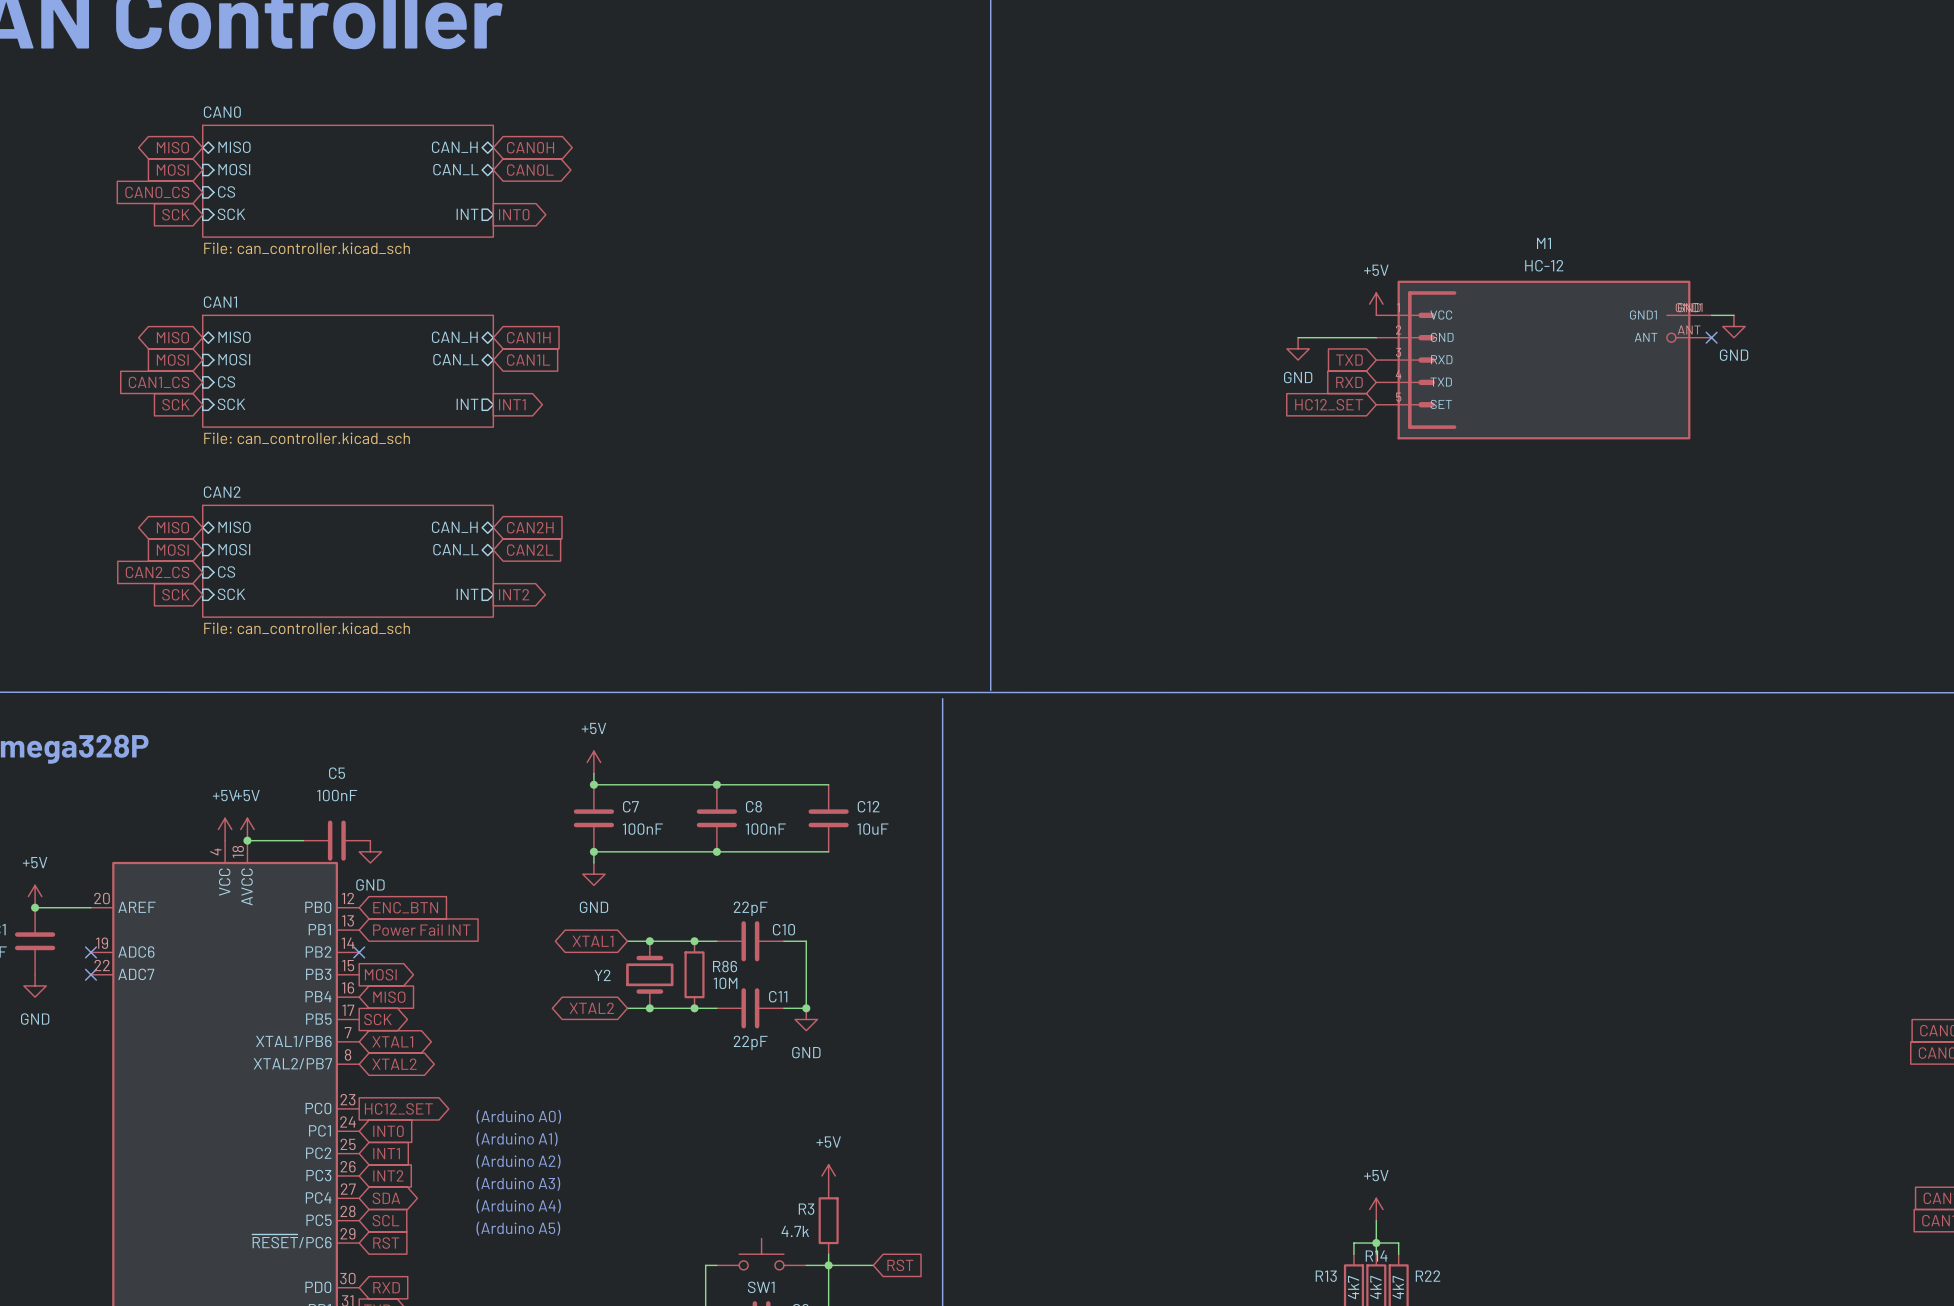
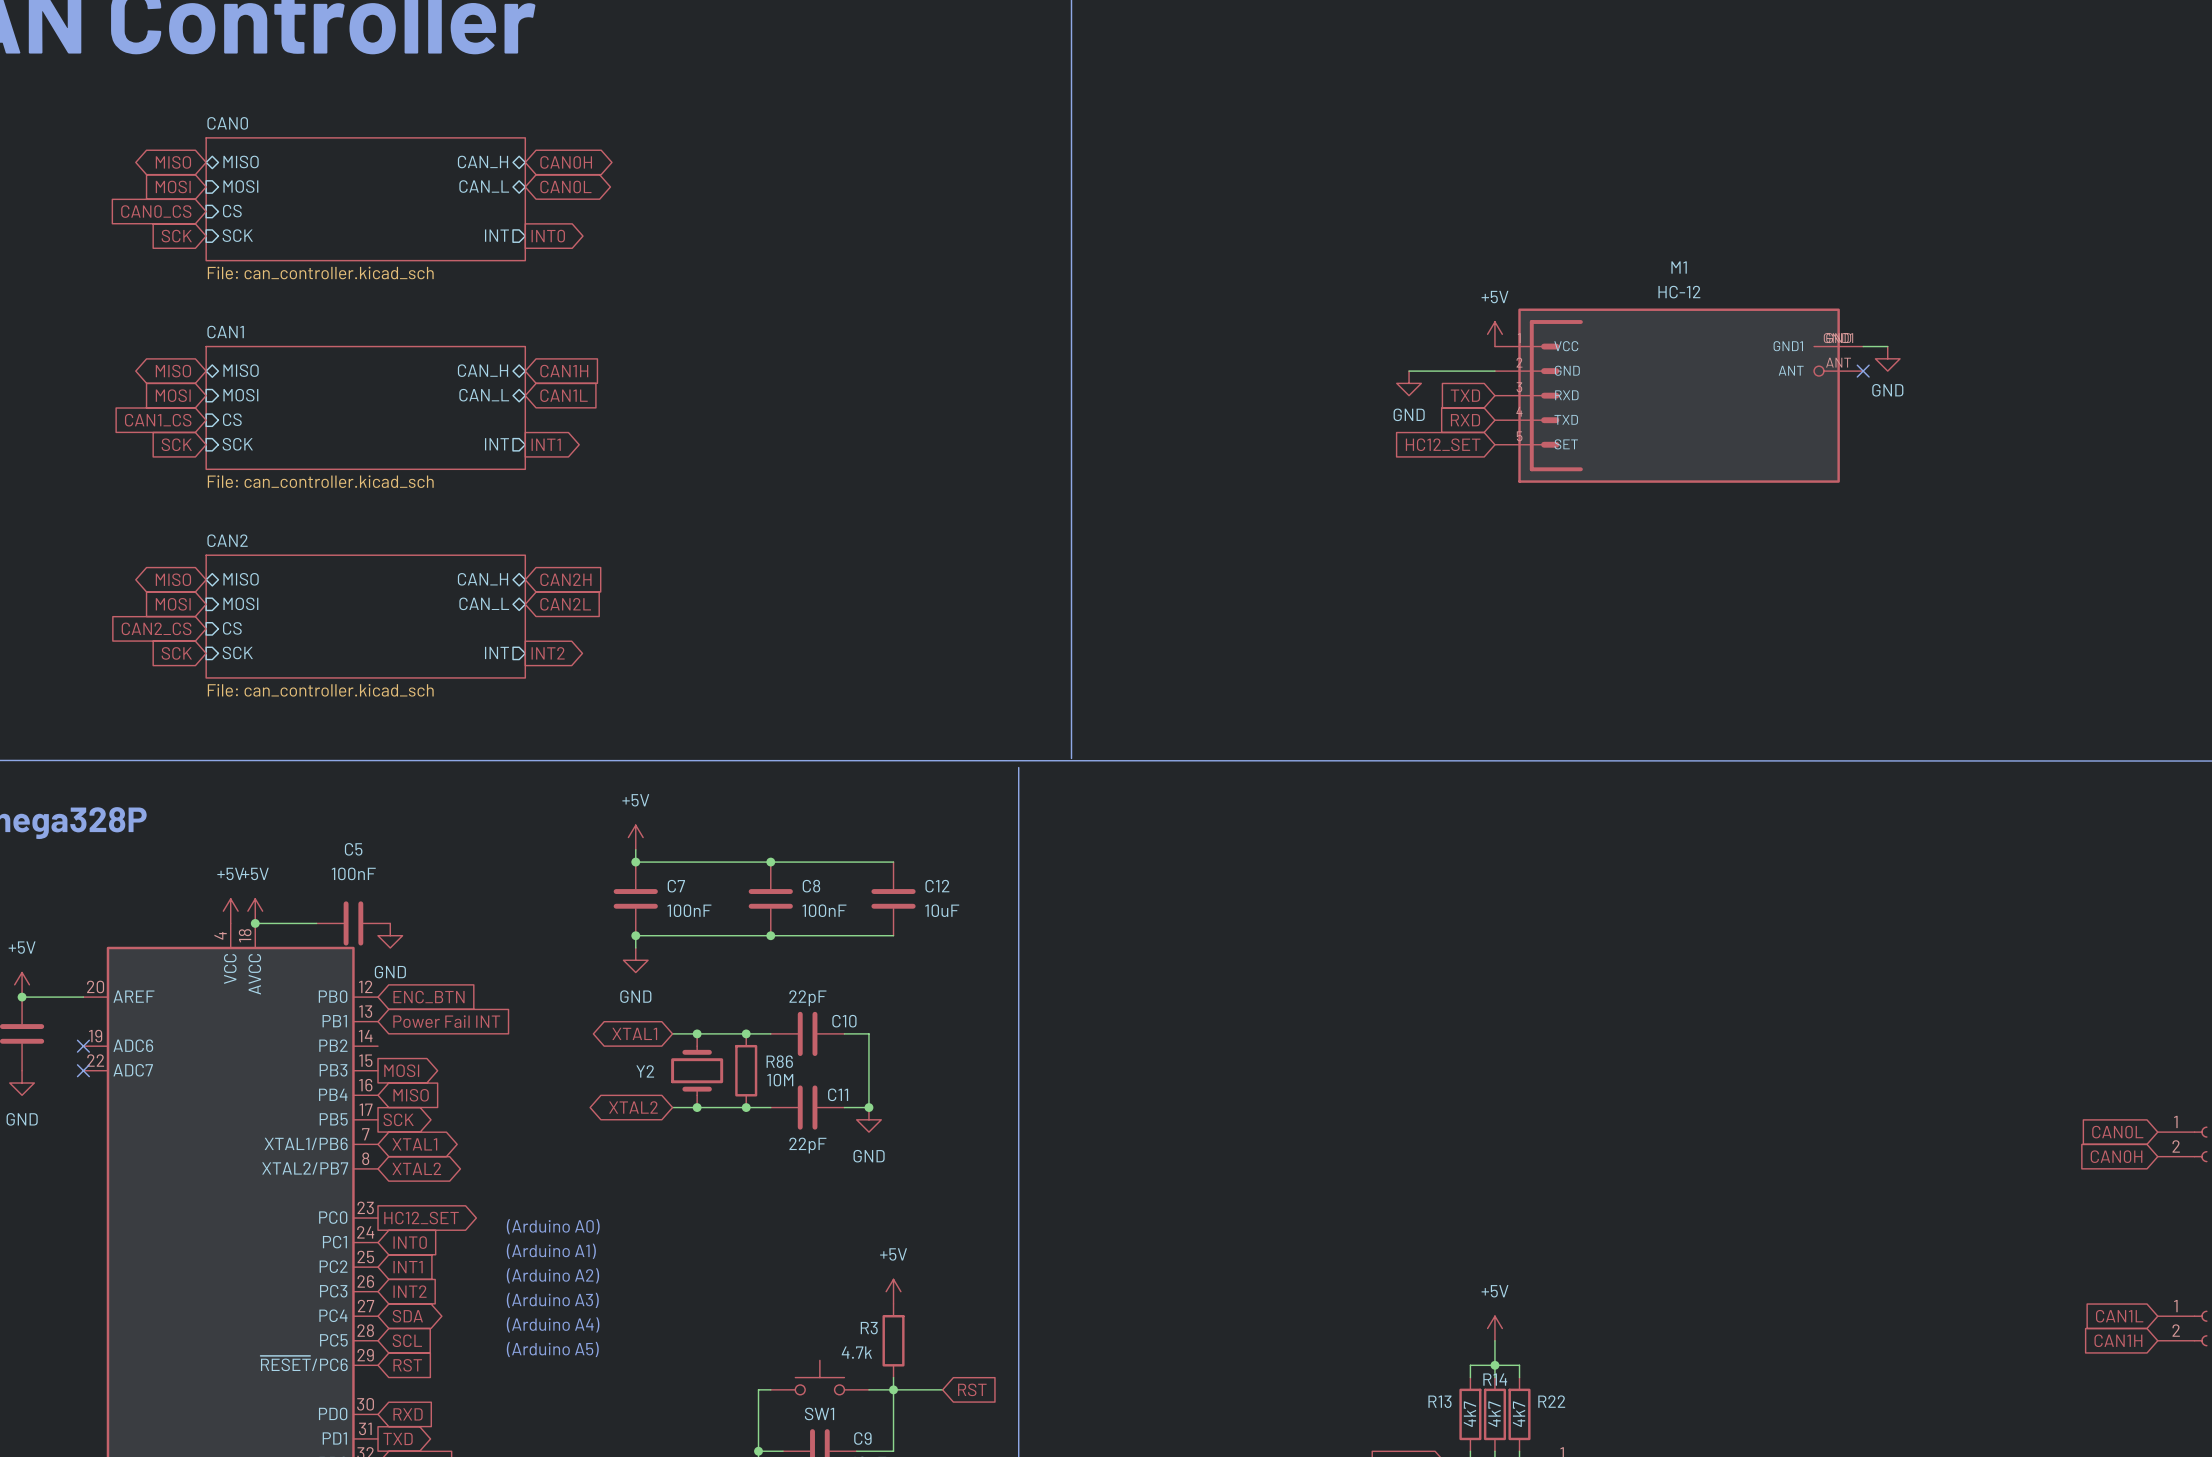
no-connect mark: (359, 952) -> none

